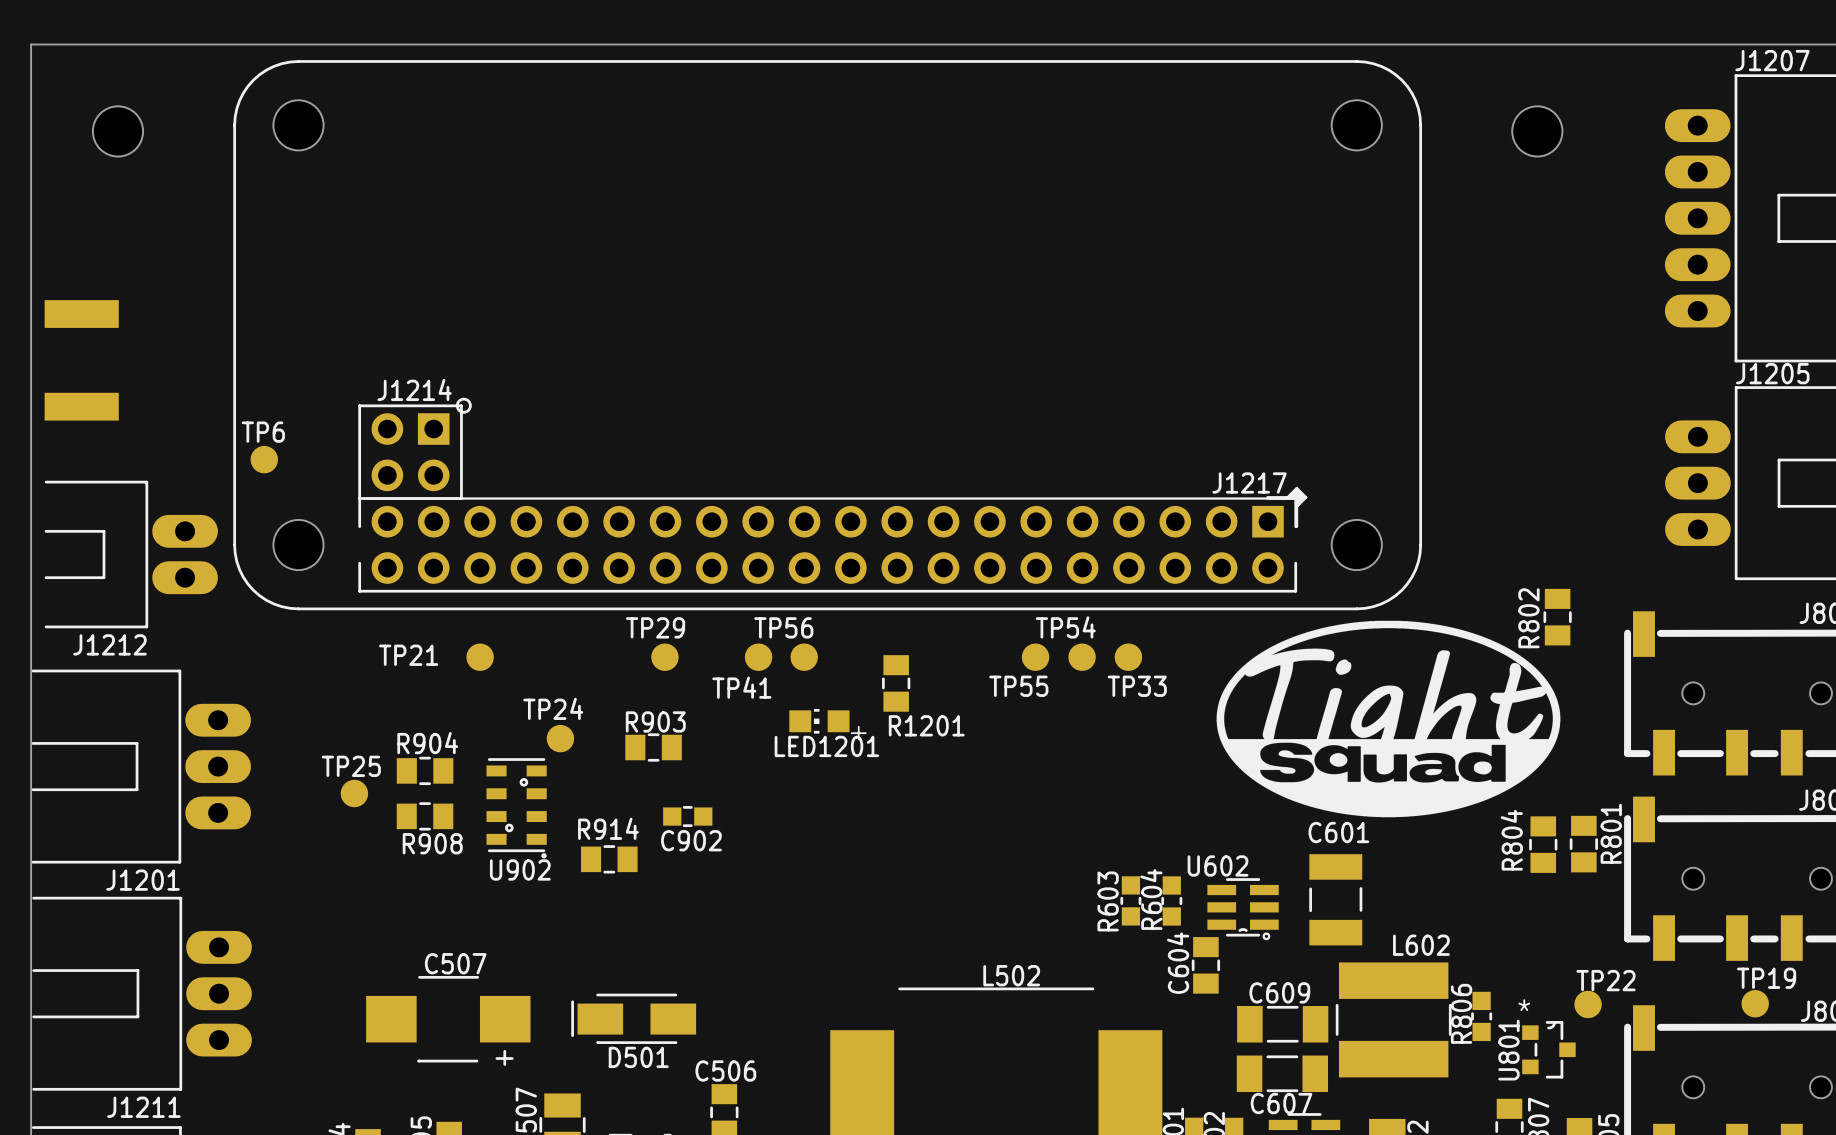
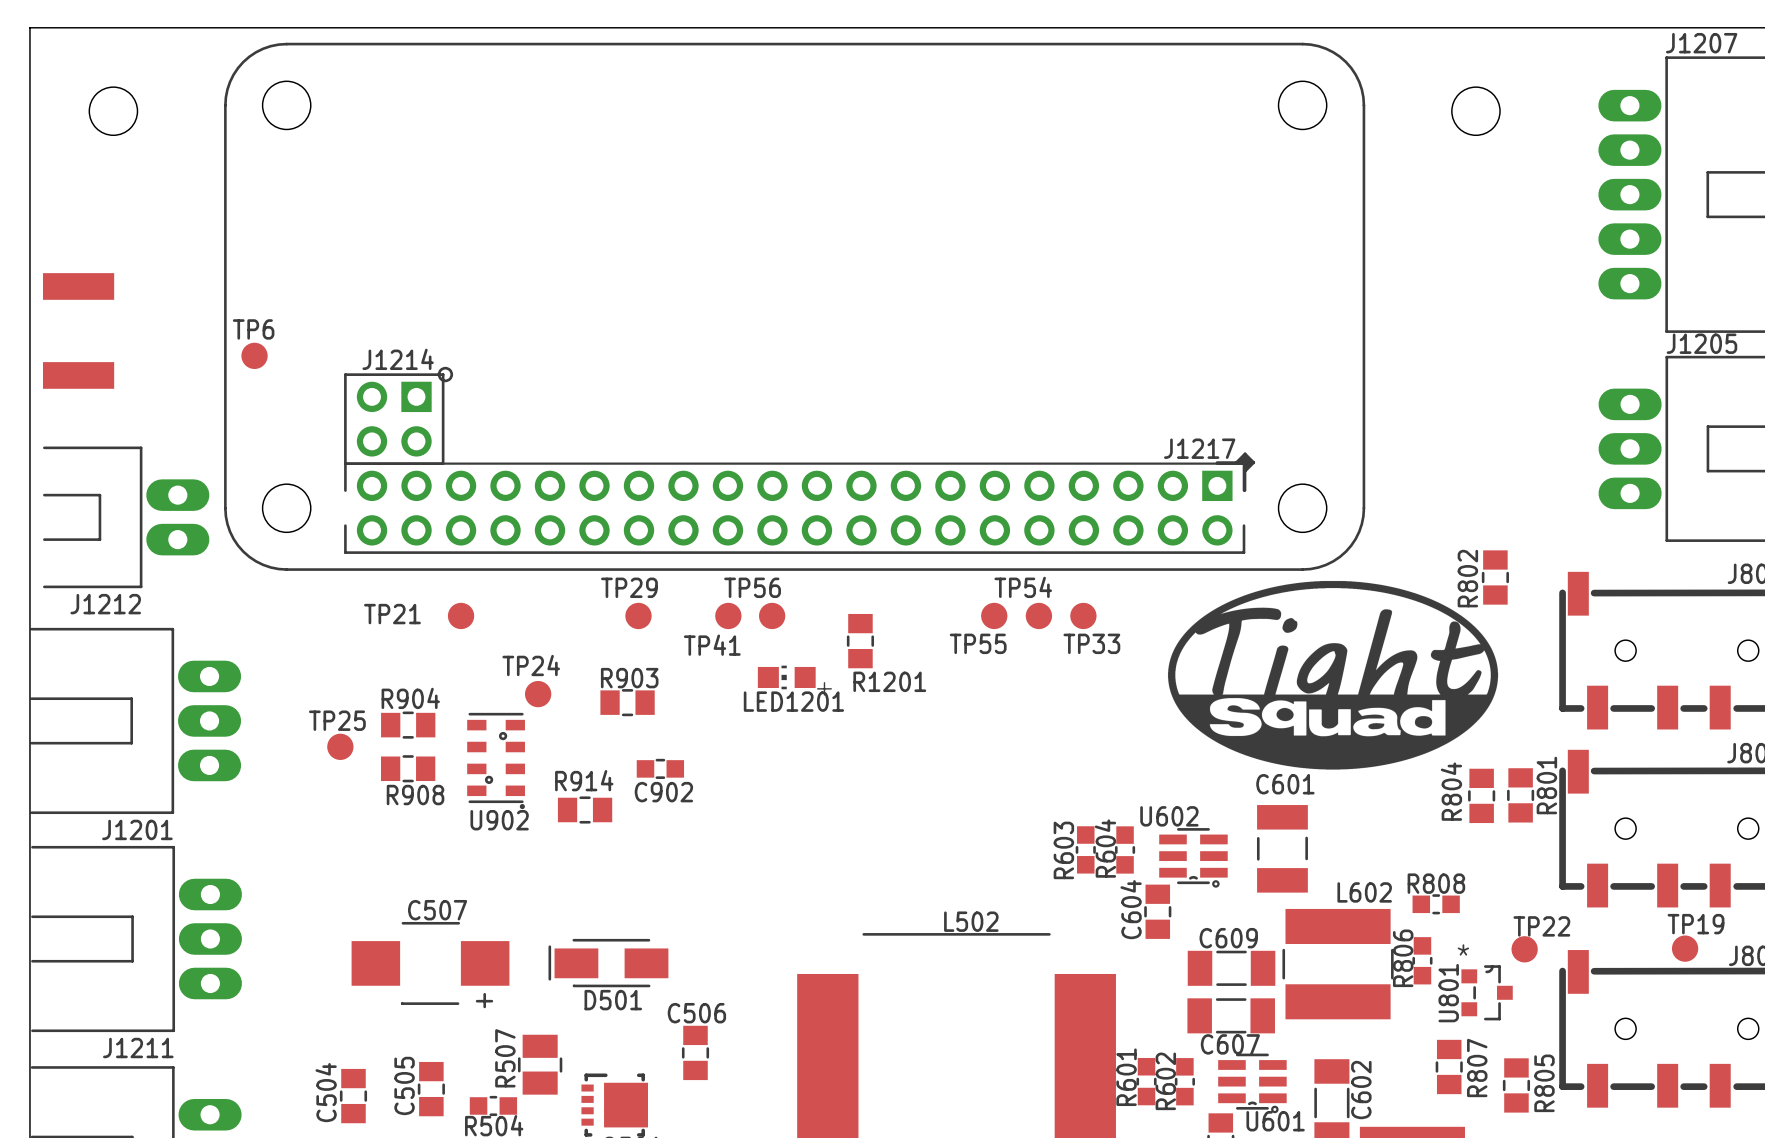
TP6 position: (264, 459) -> (254, 355)
R808: none -> (1436, 904)

